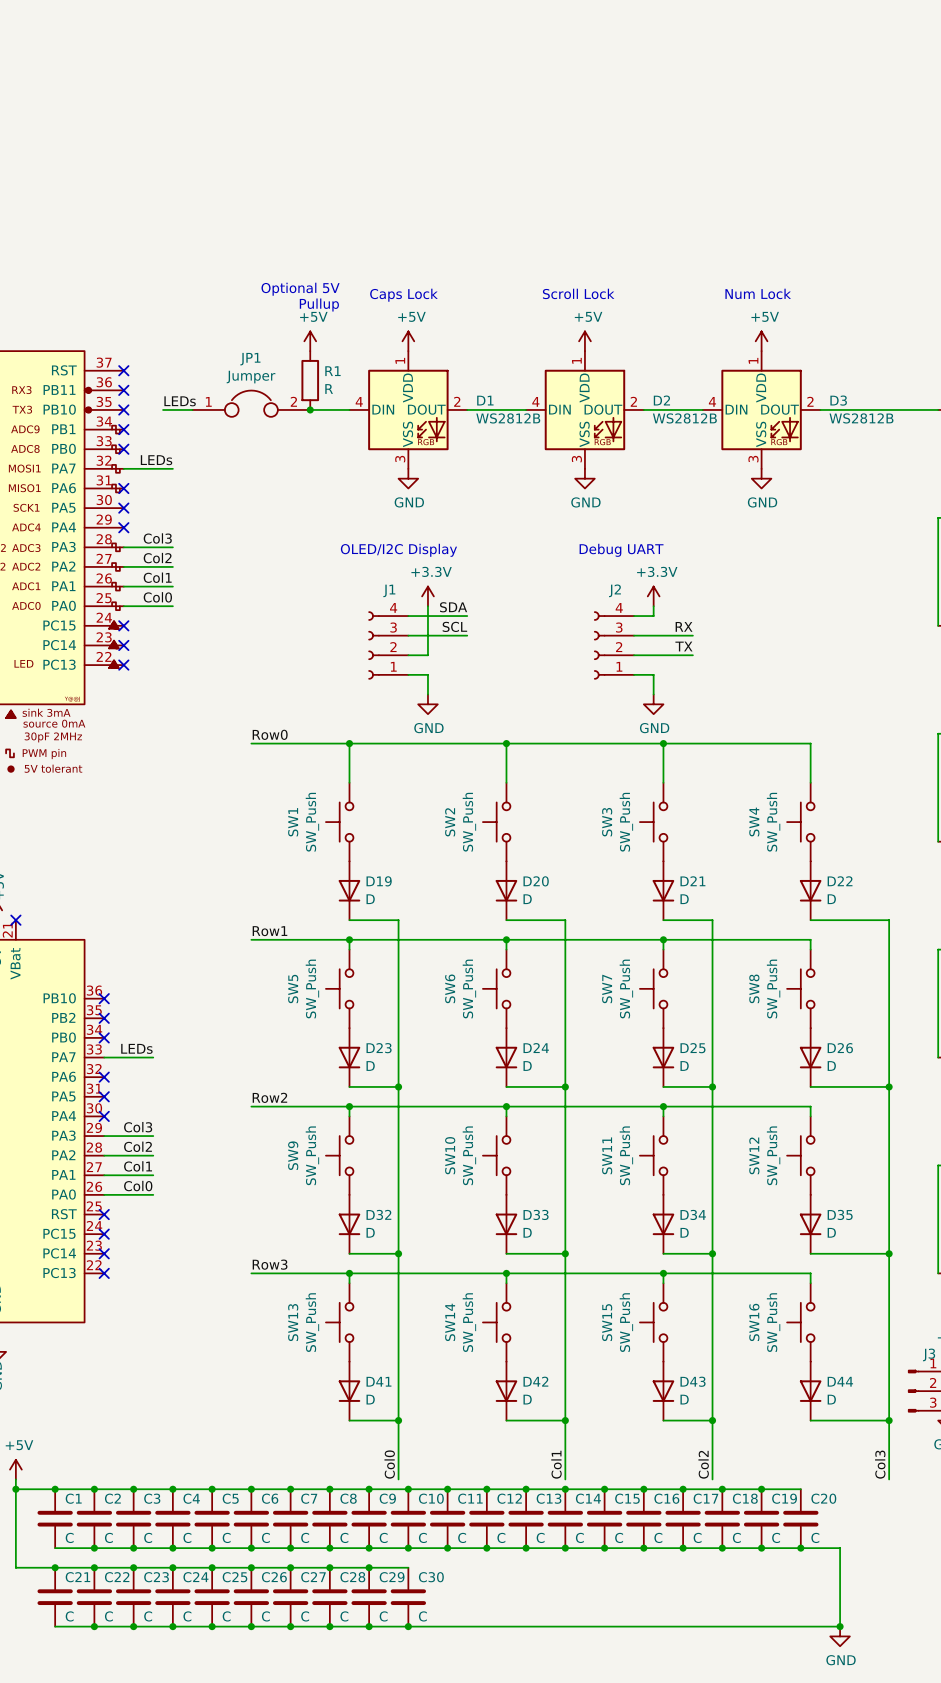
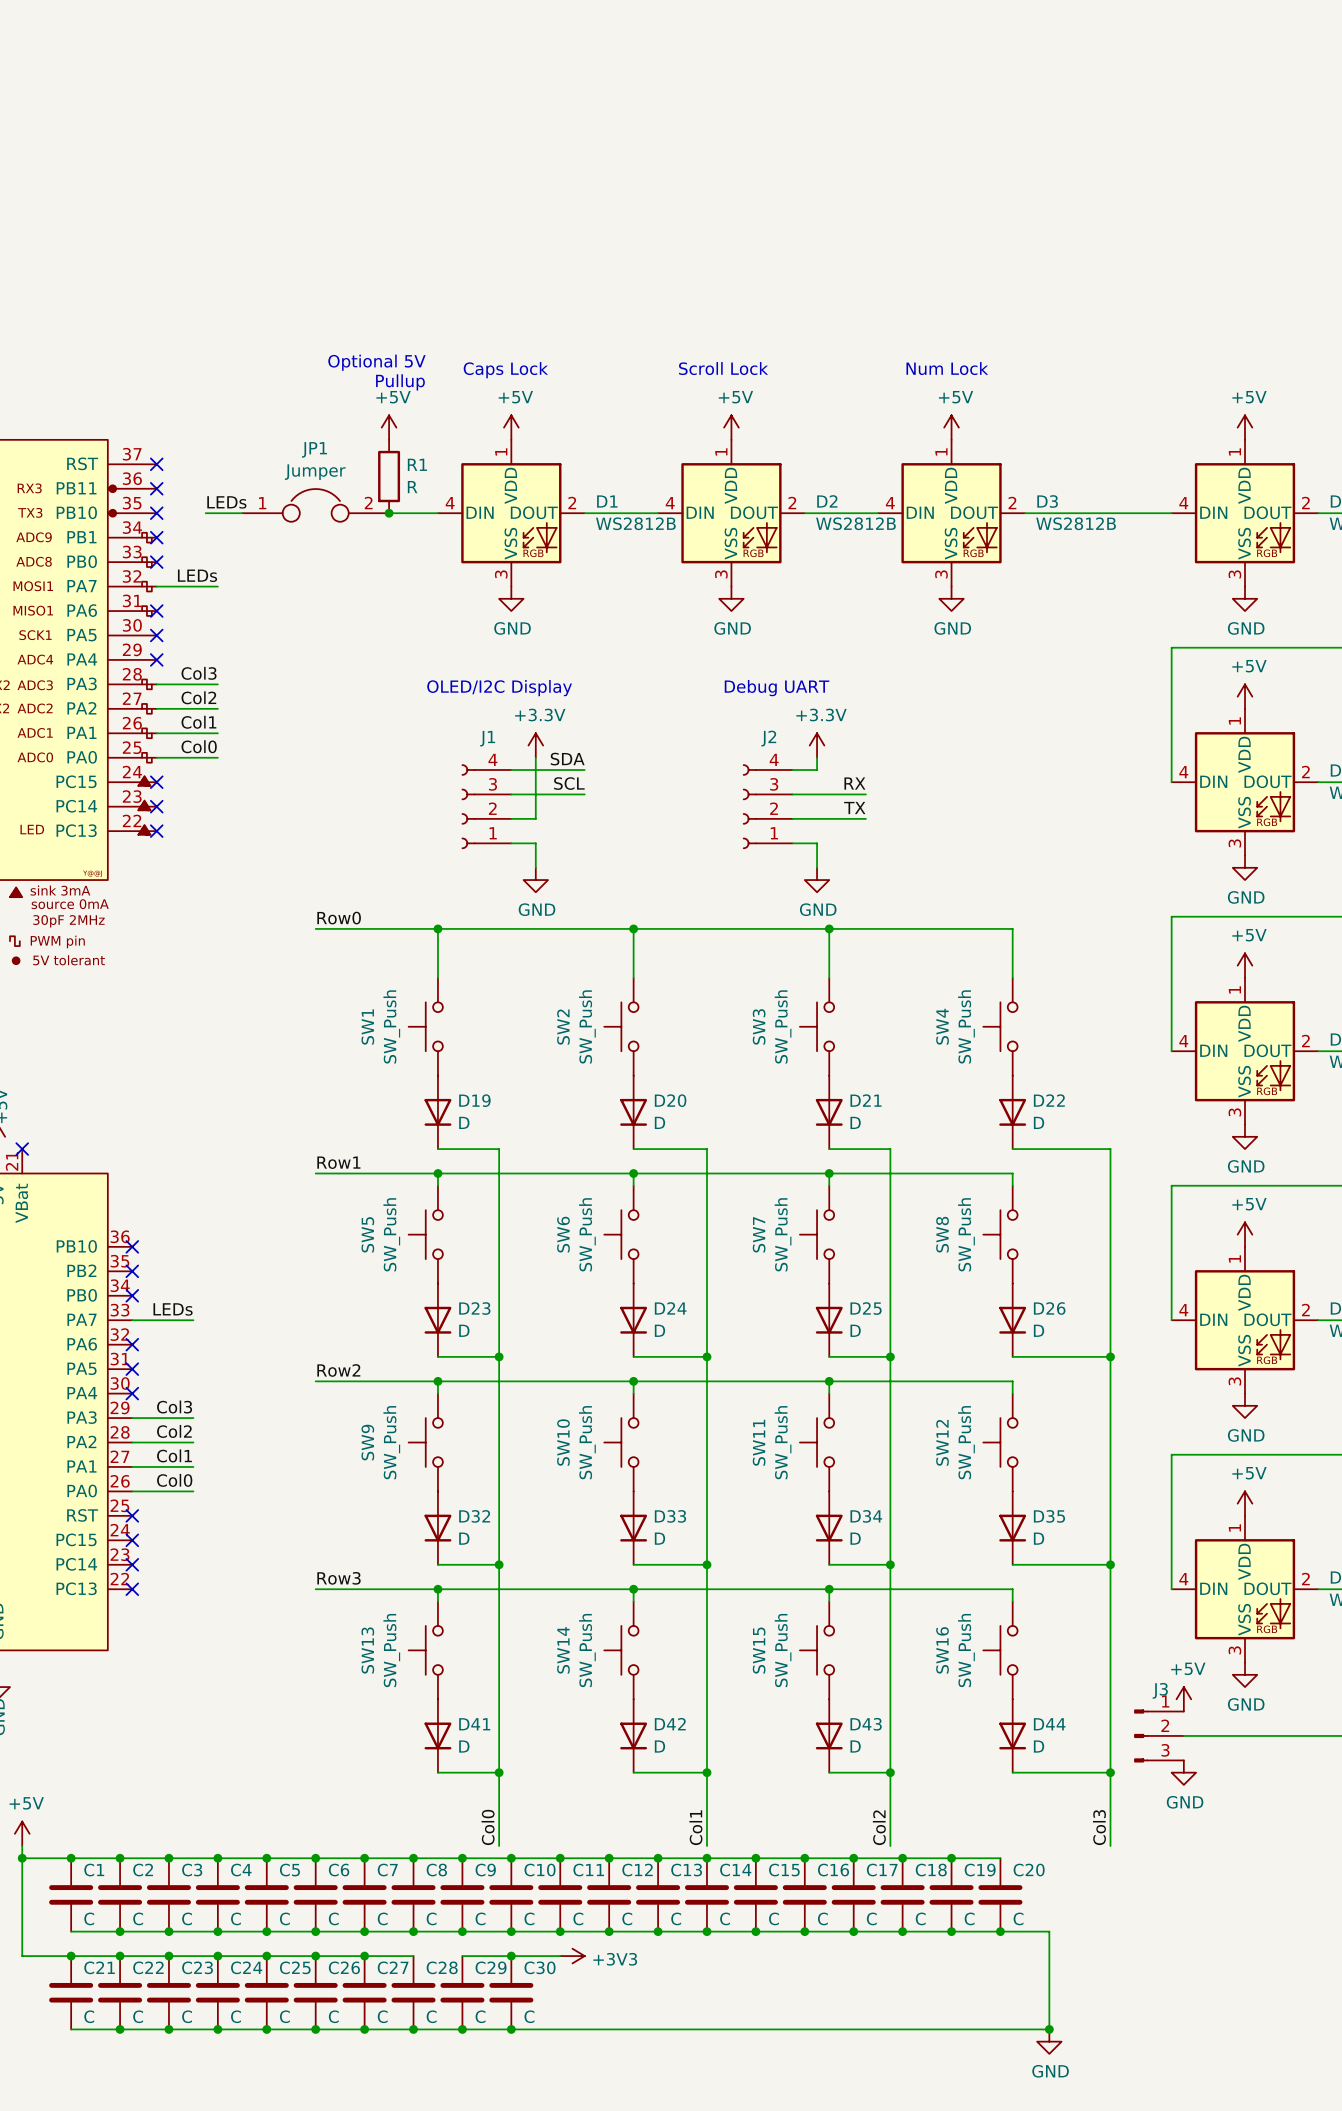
wire: (329, 1567) (369, 1567) -> (511, 1956) (560, 1956)
junction: (329, 1567) -> none
junction: (369, 1567) -> none
junction: none -> (511, 1956)
power symbol: none -> +3V3 (572, 1956)

